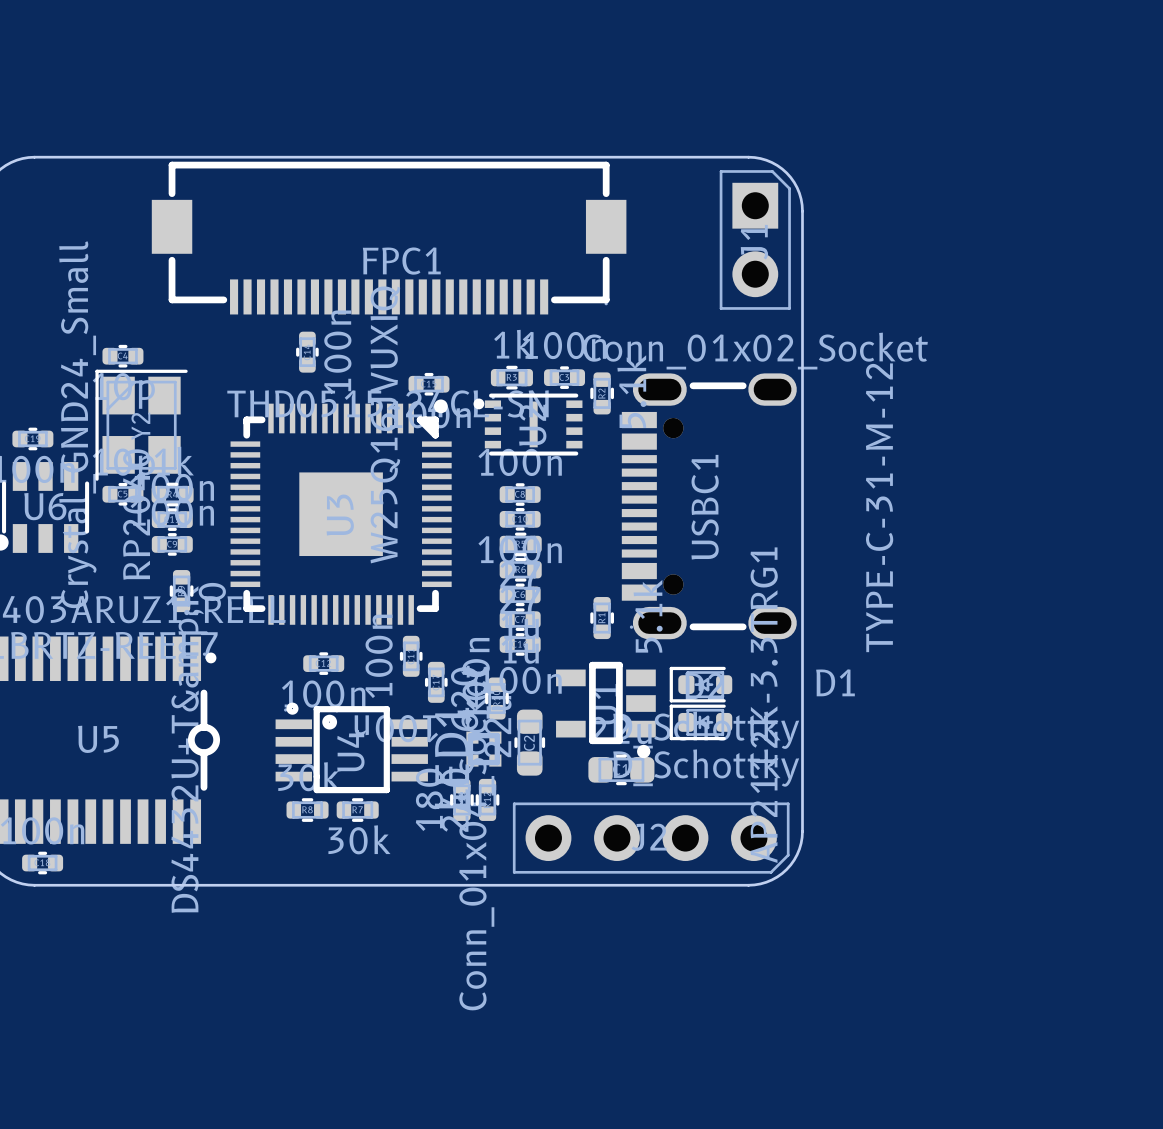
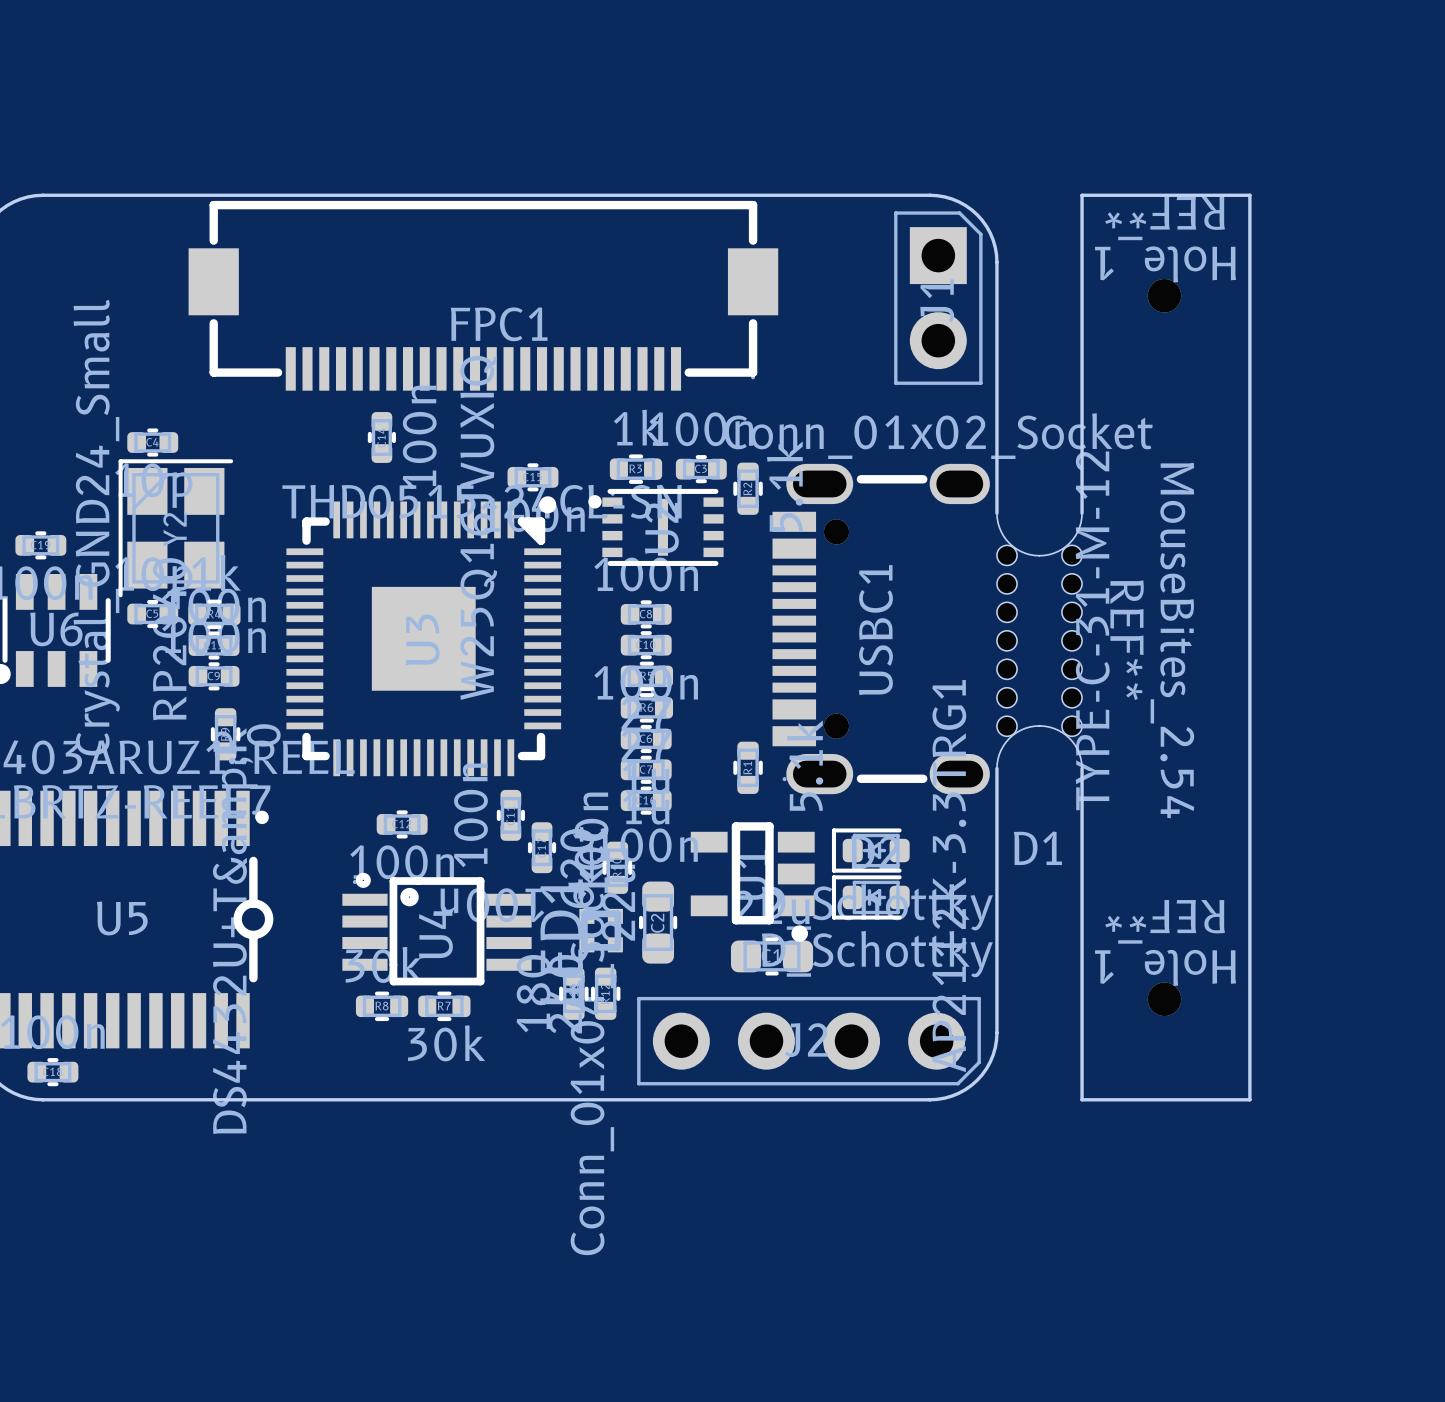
REF**: none -> Hole_1 (1164, 295)
board edge: (802, 413) (802, 618) -> none
board edge: none -> (1082, 513) (1082, 195) (1249, 195) (1249, 1099) (1082, 1099) (1082, 768)
REF**: none -> MouseBites_2.54 (1039, 640)
REF**: none -> Hole_1 (1164, 999)

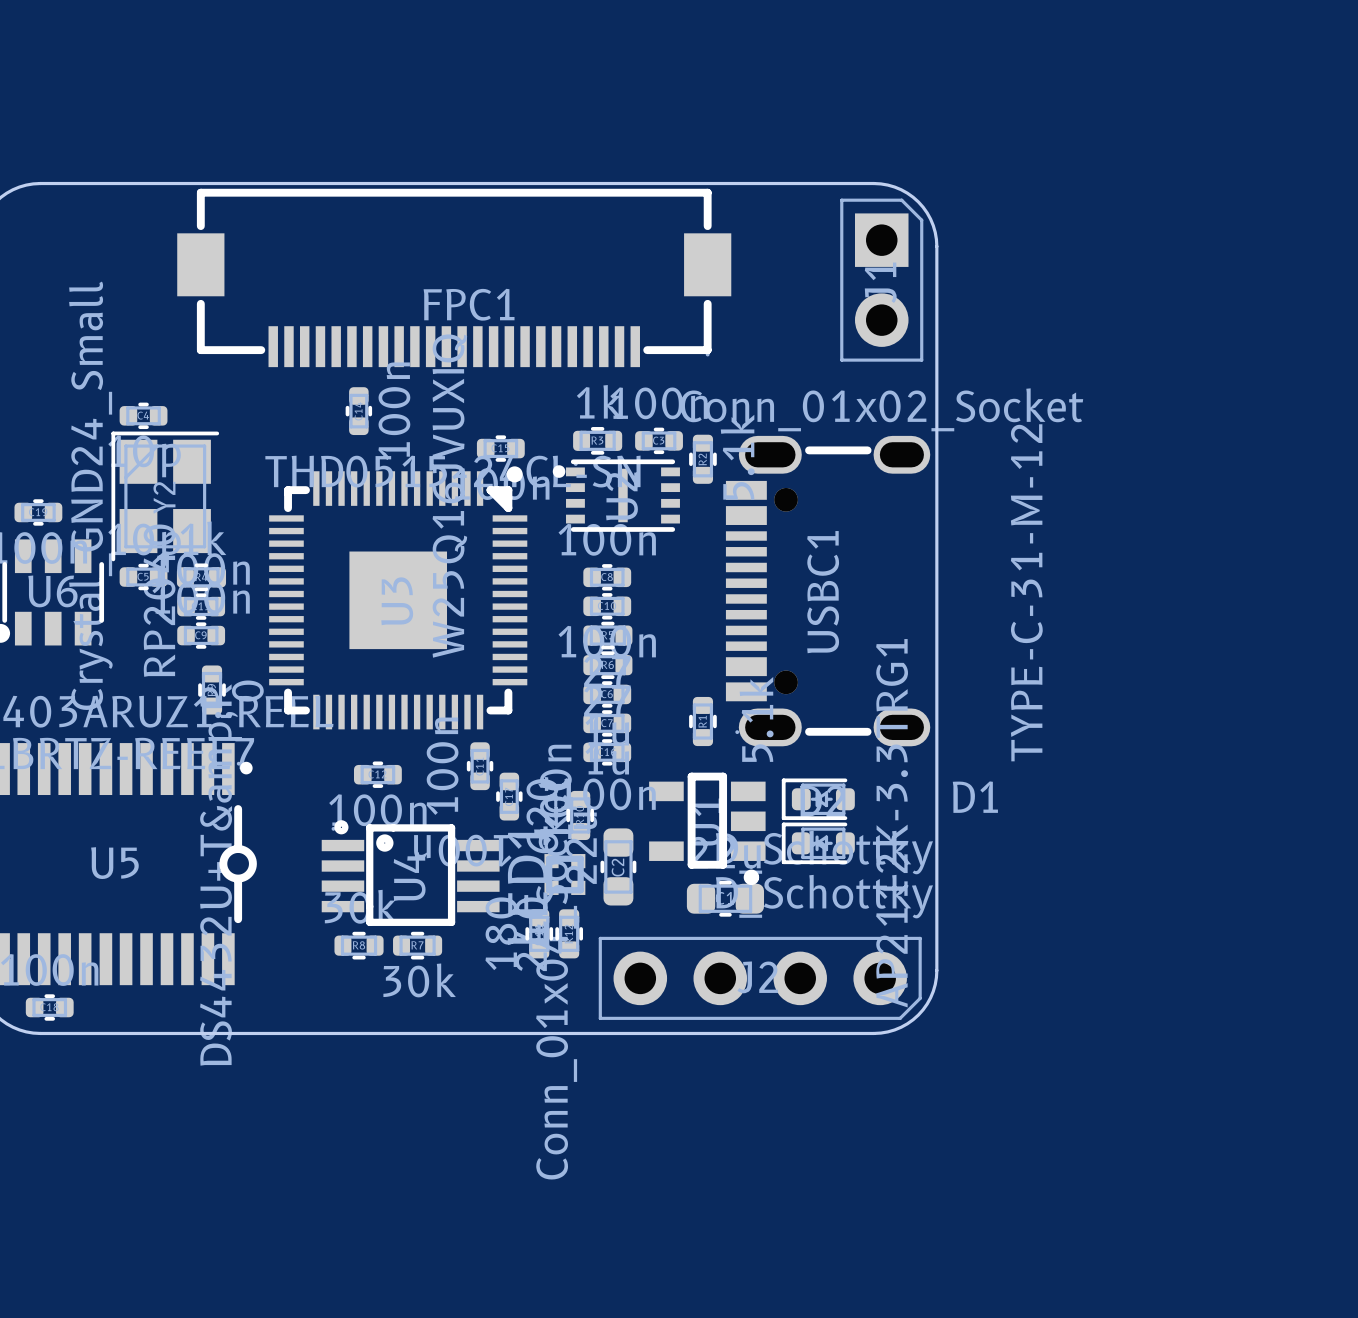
REF**: Hole_1 (1164, 295) -> none
board edge: none -> (936, 482) (936, 722)
board edge: (1082, 513) (1082, 195) (1249, 195) (1249, 1099) (1082, 1099) (1082, 768) -> none
REF**: MouseBites_2.54 (1039, 640) -> none
REF**: Hole_1 (1164, 999) -> none

